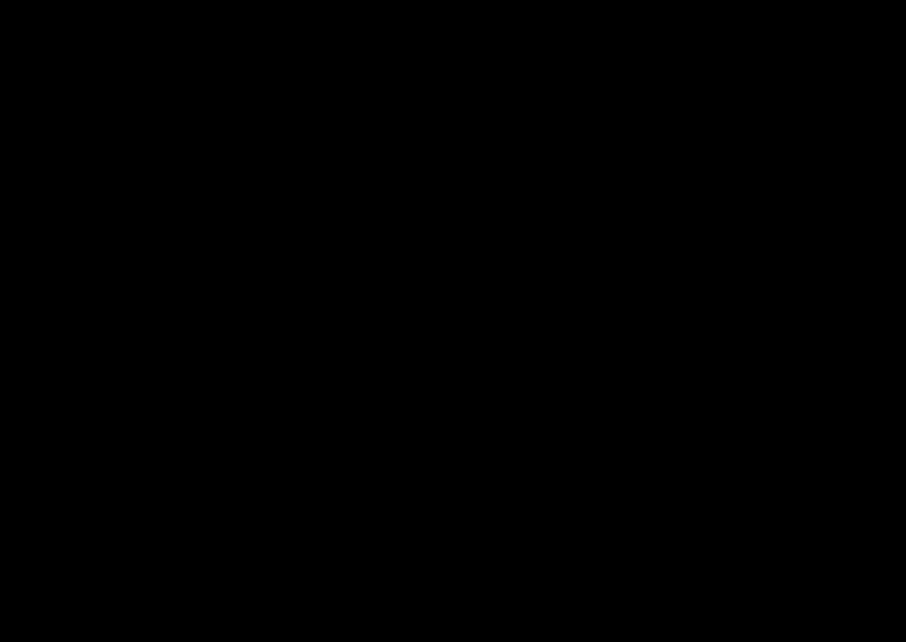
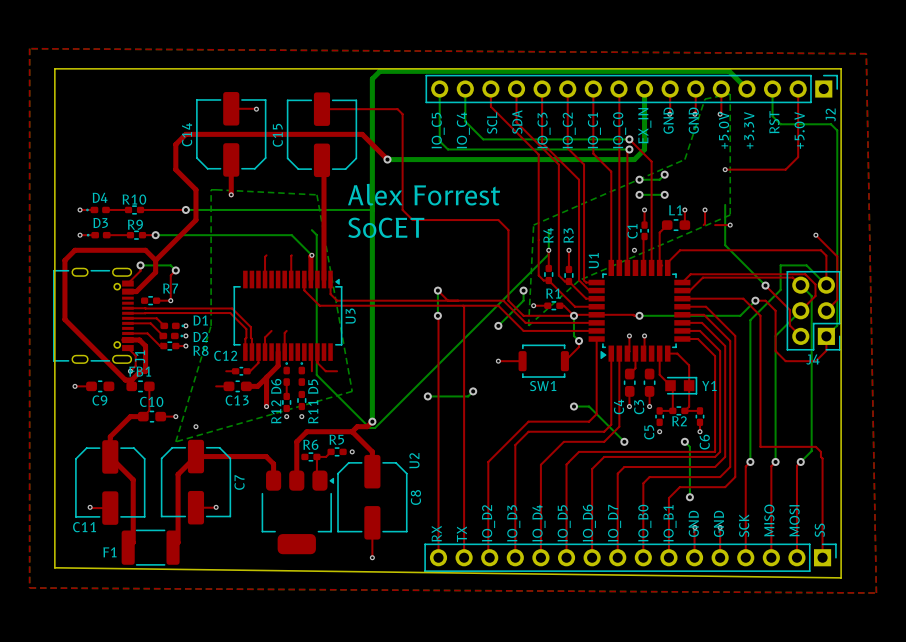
top zone outline: none -> (29, 48) (29, 587) (876, 593) (866, 53) (29, 48)
board edge: none -> (54, 68) (54, 567) (841, 577) (841, 68) (54, 68)
bottom track: none -> (439, 89) (439, 141) (447, 149) (629, 149)
bottom track: none -> (465, 89) (465, 121) (483, 139) (629, 139)
top track: none -> (490, 89) (490, 106) (538, 154) (538, 275) (543, 280) (548, 280) (574, 306) (596, 306)
top track: none -> (516, 89) (516, 122) (558, 164) (558, 275) (564, 281) (568, 281) (586, 298) (596, 298)
top track: none -> (542, 89) (542, 142) (579, 179) (579, 280) (589, 290) (596, 290)
top track: none -> (567, 89) (567, 148) (584, 164) (584, 280) (586, 282) (596, 282)
top track: none -> (593, 89) (593, 153) (611, 171) (611, 267)
top track: none -> (618, 89) (619, 267)
J2: none -> (631, 89)
bottom track: none -> (644, 89) (644, 149) (634, 159) (387, 159)
top track: none -> (670, 89) (669, 114)
top track: none -> (695, 89) (694, 114)
top track: none -> (721, 89) (720, 114)
bottom track: none -> (746, 89) (729, 71) (379, 71) (372, 78) (372, 421)
bottom track: none -> (772, 89) (772, 116) (780, 124) (831, 124) (837, 130) (837, 325) (826, 336)
top track: none -> (798, 89) (798, 157) (785, 169) (725, 169)
bottom zone outline: none -> (730, 94) (705, 99) (684, 159) (533, 225) (528, 325) (579, 280) (730, 215) (730, 94)
top track: none -> (231, 108) (256, 109)
via: none -> (256, 109)
top track: none -> (321, 109) (397, 109) (402, 114) (402, 209) (412, 220) (498, 220) (508, 230) (508, 300) (523, 315) (573, 315)
via: none -> (669, 114)
via: none -> (694, 114)
via: none -> (720, 114)
text: none -> GND (668, 120)
text: none -> GND (693, 120)
text: none -> SDA (517, 122)
text: none -> RST (774, 122)
text: none -> SCL (492, 123)
text: none -> EX_IN (644, 125)
text: none -> IO_C5 (438, 130)
text: none -> IO_C4 (463, 130)
text: none -> IO_C3 (544, 130)
text: none -> IO_C2 (569, 130)
text: none -> IO_C1 (594, 130)
text: none -> IO_C0 (619, 130)
text: none -> +5.0V (724, 130)
text: none -> +3.3V (749, 130)
text: none -> +5.0V (799, 130)
C14: none -> (231, 134)
C15: none -> (321, 134)
top track: none -> (629, 139) (651, 161) (651, 267)
via: none -> (629, 139)
top track: none -> (629, 149) (627, 151) (627, 267)
via: none -> (629, 149)
top track: none -> (231, 159) (231, 194)
top track: none -> (387, 159) (362, 134) (185, 134) (175, 144) (175, 169) (195, 189) (195, 220) (155, 260)
via: none -> (387, 159)
top track: none -> (321, 160) (323, 162) (323, 279)
via: none -> (725, 169)
bottom track: none -> (664, 174) (659, 179) (639, 179)
via: none -> (664, 174)
via: none -> (639, 179)
bottom zone outline: none -> (211, 189) (316, 194) (352, 391) (175, 441) (211, 325) (211, 189)
via: none -> (231, 194)
text: none -> Alex Forrest (424, 194)
bottom track: none -> (639, 194) (664, 194)
via: none -> (639, 194)
via: none -> (664, 194)
bottom track: none -> (725, 204) (725, 245) (765, 285)
top track: none -> (80, 209) (94, 209)
via: none -> (80, 209)
D4: none -> (98, 209)
top track: none -> (105, 209) (128, 209)
R10: none -> (134, 209)
top track: none -> (140, 209) (185, 209)
bottom track: none -> (185, 209) (372, 209)
via: none -> (185, 209)
top track: none -> (644, 209) (644, 225)
via: none -> (644, 209)
top track: none -> (684, 209) (684, 225)
via: none -> (684, 209)
top track: none -> (705, 209) (703, 225)
via: none -> (705, 209)
top track: none -> (667, 225) (659, 232) (659, 267) (662, 265)
L1: none -> (676, 225)
top track: none -> (715, 225) (730, 225)
via: none -> (730, 225)
text: none -> SoCET (386, 227)
bottom track: none -> (311, 230) (316, 234) (316, 374) (369, 428) (375, 428) (548, 254) (548, 230)
C1: none -> (644, 230)
top track: none -> (80, 235) (95, 235)
via: none -> (80, 235)
D3: none -> (98, 235)
top track: none -> (106, 235) (130, 235)
R9: none -> (136, 235)
top track: none -> (142, 235) (155, 235)
bottom track: none -> (155, 235) (291, 235) (311, 255)
via: none -> (155, 235)
top track: none -> (815, 235) (837, 256) (837, 299) (826, 310)
via: none -> (815, 235)
top track: none -> (644, 236) (643, 267)
top track: none -> (548, 250) (548, 268)
via: none -> (548, 250)
top track: none -> (568, 250) (568, 269)
via: none -> (568, 250)
via: none -> (634, 250)
top track: none -> (266, 255) (265, 279)
top track: none -> (291, 255) (291, 279)
top track: none -> (311, 255) (310, 279)
via: none -> (311, 255)
top track: none -> (155, 260) (145, 250) (75, 250) (64, 260) (64, 319) (125, 380) (131, 380) (140, 371) (145, 371) (145, 346) (139, 340) (123, 340)
top track: none -> (155, 260) (155, 272) (136, 291) (127, 291)
top track: none -> (140, 265) (140, 270) (127, 283)
bottom track: none -> (140, 265) (170, 265) (175, 270)
via: none -> (140, 265)
top track: none -> (667, 267) (667, 262) (680, 250) (820, 250) (826, 255) (826, 285)
top track: none -> (175, 270) (170, 275) (170, 300) (156, 300)
via: none -> (175, 270)
R4: none -> (548, 274)
R3: none -> (568, 275)
top track: none -> (304, 279) (304, 290) (319, 305) (498, 305) (523, 330) (596, 330)
top track: none -> (330, 279) (330, 294) (337, 300) (503, 300) (525, 322) (596, 322)
top track: none -> (682, 282) (690, 274) (805, 274) (815, 284) (815, 296) (800, 310)
top track: none -> (765, 285) (789, 309) (789, 325) (800, 336)
via: none -> (765, 285)
bottom track: none -> (800, 285) (811, 296) (811, 451) (800, 461)
bottom track: none -> (826, 285) (806, 265) (780, 265) (780, 289) (750, 320) (750, 461)
top track: none -> (437, 290) (447, 300)
bottom track: none -> (437, 290) (437, 315)
via: none -> (437, 290)
bottom track: none -> (523, 290) (523, 300) (498, 325)
via: none -> (523, 290)
top track: none -> (682, 290) (689, 290) (702, 277) (792, 277) (800, 285) (795, 290)
top track: none -> (682, 298) (743, 298) (760, 315) (760, 446) (815, 446) (820, 451) (822, 458) (822, 557)
R7: none -> (150, 300)
via: none -> (170, 300)
top track: none -> (755, 300) (765, 300) (775, 310) (775, 351) (785, 361) (815, 361) (826, 350) (826, 336)
bottom track: none -> (755, 300) (740, 315) (639, 315)
via: none -> (755, 300)
top track: none -> (463, 305) (464, 557)
top track: none -> (533, 305) (547, 305)
via: none -> (533, 305)
R1: none -> (553, 305)
top track: none -> (559, 305) (563, 305) (573, 315)
top track: none -> (682, 306) (706, 306) (735, 335) (735, 477) (725, 487) (679, 487) (668, 498) (668, 557)
top track: none -> (127, 308) (232, 308) (250, 327) (250, 351)
U1: none -> (639, 310)
bottom track: none -> (800, 310) (775, 335) (775, 461)
J4: none -> (813, 310)
top track: none -> (127, 313) (230, 313) (246, 329) (246, 351)
top track: none -> (574, 314) (639, 315)
top track: none -> (682, 314) (704, 314) (730, 341) (730, 467) (720, 477) (649, 477) (643, 483) (643, 557)
J1: none -> (93, 315)
U3: none -> (287, 315)
top track: none -> (437, 315) (438, 557)
via: none -> (437, 315)
bottom track: none -> (573, 315) (573, 335) (579, 341)
via: none -> (573, 315)
via: none -> (639, 315)
top track: none -> (127, 318) (156, 318) (164, 325)
top track: none -> (682, 322) (702, 322) (725, 346) (725, 456) (715, 467) (624, 467) (617, 473) (617, 557)
top track: none -> (127, 323) (150, 323) (163, 335) (160, 338)
D1: none -> (172, 325)
via: none -> (185, 325)
via: none -> (498, 325)
top track: none -> (271, 330) (265, 337) (265, 352)
top track: none -> (286, 330) (284, 332) (284, 352)
top track: none -> (682, 330) (699, 330) (720, 351) (720, 451) (715, 456) (604, 456) (592, 469) (592, 557)
top track: none -> (127, 333) (147, 333) (160, 346) (163, 346) (161, 343)
D2: none -> (171, 335)
via: none -> (185, 335)
top track: none -> (629, 335) (629, 351) (627, 353)
via: none -> (629, 335)
top track: none -> (644, 335) (643, 353)
via: none -> (644, 335)
top track: none -> (596, 338) (596, 414) (589, 421) (528, 421) (488, 461) (489, 557)
top track: none -> (682, 338) (697, 338) (715, 356) (715, 451) (579, 451) (568, 461)
top track: none -> (579, 341) (579, 347) (564, 361)
via: none -> (579, 341)
R8: none -> (169, 346)
top track: none -> (175, 346) (185, 346)
via: none -> (185, 346)
top track: none -> (127, 348) (135, 355) (135, 366) (130, 371)
top track: none -> (258, 352) (258, 362) (250, 371) (247, 371)
top track: none -> (278, 352) (278, 365) (257, 386) (246, 386)
top track: none -> (310, 352) (311, 371)
top track: none -> (317, 352) (317, 362) (325, 371) (337, 371)
top track: none -> (611, 353) (611, 424) (604, 431) (528, 431) (515, 445) (515, 557)
top track: none -> (619, 353) (619, 426) (604, 441) (563, 441) (540, 464) (540, 557)
top track: none -> (635, 353) (635, 368) (629, 374)
top track: none -> (659, 353) (659, 374) (672, 388) (672, 410) (659, 410)
top track: none -> (667, 353) (677, 353) (689, 365) (689, 406) (684, 410) (699, 410)
top track: none -> (498, 361) (522, 361)
via: none -> (498, 361)
SW1: none -> (543, 361)
via: none -> (130, 371)
top track: none -> (226, 371) (235, 371)
C12: none -> (241, 371)
D6: none -> (286, 374)
D5: none -> (301, 374)
top track: none -> (266, 377) (266, 406)
top track: none -> (286, 382) (286, 396)
C4: none -> (629, 382)
C3: none -> (649, 382)
Y1: none -> (681, 385)
top track: none -> (75, 386) (91, 386)
via: none -> (75, 386)
C9: none -> (100, 386)
FB1: none -> (140, 386)
top track: none -> (149, 386) (149, 410) (143, 416)
top track: none -> (216, 386) (228, 386)
C13: none -> (237, 386)
bottom track: none -> (473, 391) (468, 396) (427, 396)
via: none -> (473, 391)
top track: none -> (629, 391) (629, 406)
top track: none -> (649, 391) (649, 406)
via: none -> (427, 396)
R11: none -> (301, 400)
R12: none -> (286, 402)
via: none -> (266, 406)
bottom track: none -> (573, 406) (589, 406) (624, 441)
via: none -> (573, 406)
via: none -> (629, 406)
via: none -> (649, 406)
R2: none -> (678, 410)
top track: none -> (143, 416) (130, 416) (110, 436) (110, 456) (133, 479) (133, 542) (128, 547)
C10: none -> (152, 416)
top track: none -> (160, 416) (175, 416)
via: none -> (175, 416)
via: none -> (286, 416)
via: none -> (301, 416)
C5: none -> (659, 416)
C6: none -> (699, 416)
top track: none -> (372, 421) (367, 426) (357, 426) (352, 431)
via: none -> (372, 421)
top track: none -> (699, 422) (699, 431)
via: none -> (195, 426)
top track: none -> (352, 431) (306, 431) (296, 441) (296, 480)
top track: none -> (352, 431) (372, 451) (372, 471)
via: none -> (659, 431)
via: none -> (699, 431)
via: none -> (624, 441)
bottom track: none -> (684, 441) (689, 446) (689, 497)
via: none -> (684, 441)
top track: none -> (331, 451) (326, 456) (316, 456) (316, 477) (319, 480)
R5: none -> (337, 451)
via: none -> (352, 451)
R6: none -> (310, 456)
top track: none -> (750, 461) (745, 466) (745, 557)
via: none -> (750, 461)
top track: none -> (775, 461) (771, 466) (771, 557)
via: none -> (775, 461)
top track: none -> (800, 461) (796, 465) (796, 557)
via: none -> (800, 461)
top track: none -> (568, 462) (566, 464) (566, 557)
top track: none -> (273, 480) (273, 463) (266, 456) (195, 456) (178, 474) (178, 542) (173, 547)
C11: none -> (110, 482)
C7: none -> (195, 482)
C8: none -> (372, 497)
via: none -> (689, 497)
top track: none -> (90, 507) (110, 508)
via: none -> (90, 507)
top track: none -> (216, 507) (195, 507)
via: none -> (216, 507)
U2: none -> (297, 512)
text: none -> MISO (769, 520)
text: none -> MOSI (794, 520)
top track: none -> (372, 522) (372, 557)
text: none -> IO_D2 (488, 523)
text: none -> IO_D3 (513, 523)
text: none -> IO_D4 (538, 523)
text: none -> IO_D5 (564, 523)
text: none -> IO_D6 (589, 523)
text: none -> IO_D7 (614, 523)
text: none -> IO_B0 (644, 523)
text: none -> IO_B1 (670, 523)
text: none -> GND (693, 523)
text: none -> GND (718, 523)
text: none -> SCK (744, 525)
top track: none -> (694, 527) (694, 557)
via: none -> (694, 527)
top track: none -> (720, 527) (720, 557)
via: none -> (720, 527)
text: none -> SS (819, 530)
text: none -> RX (436, 533)
text: none -> TX (461, 534)
F1: none -> (150, 547)
via: none -> (372, 557)
part: none -> (630, 557)

